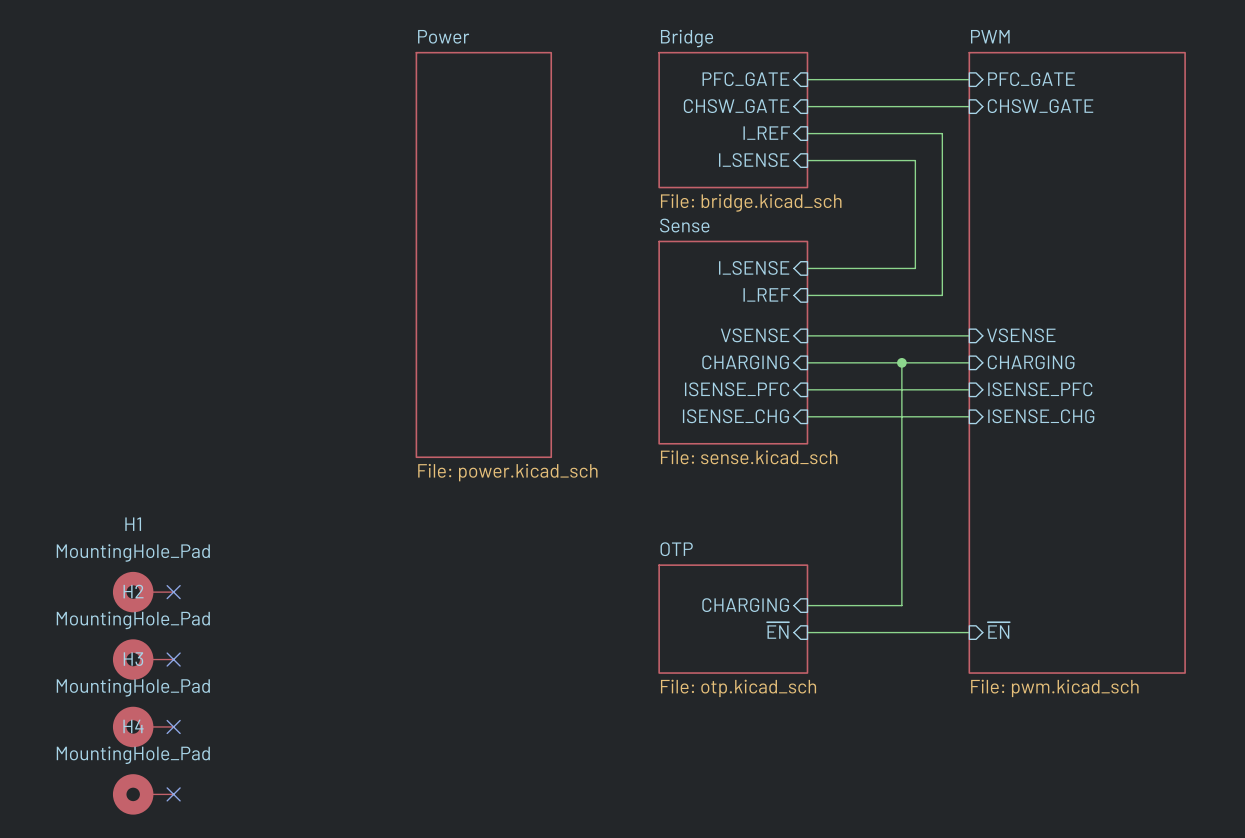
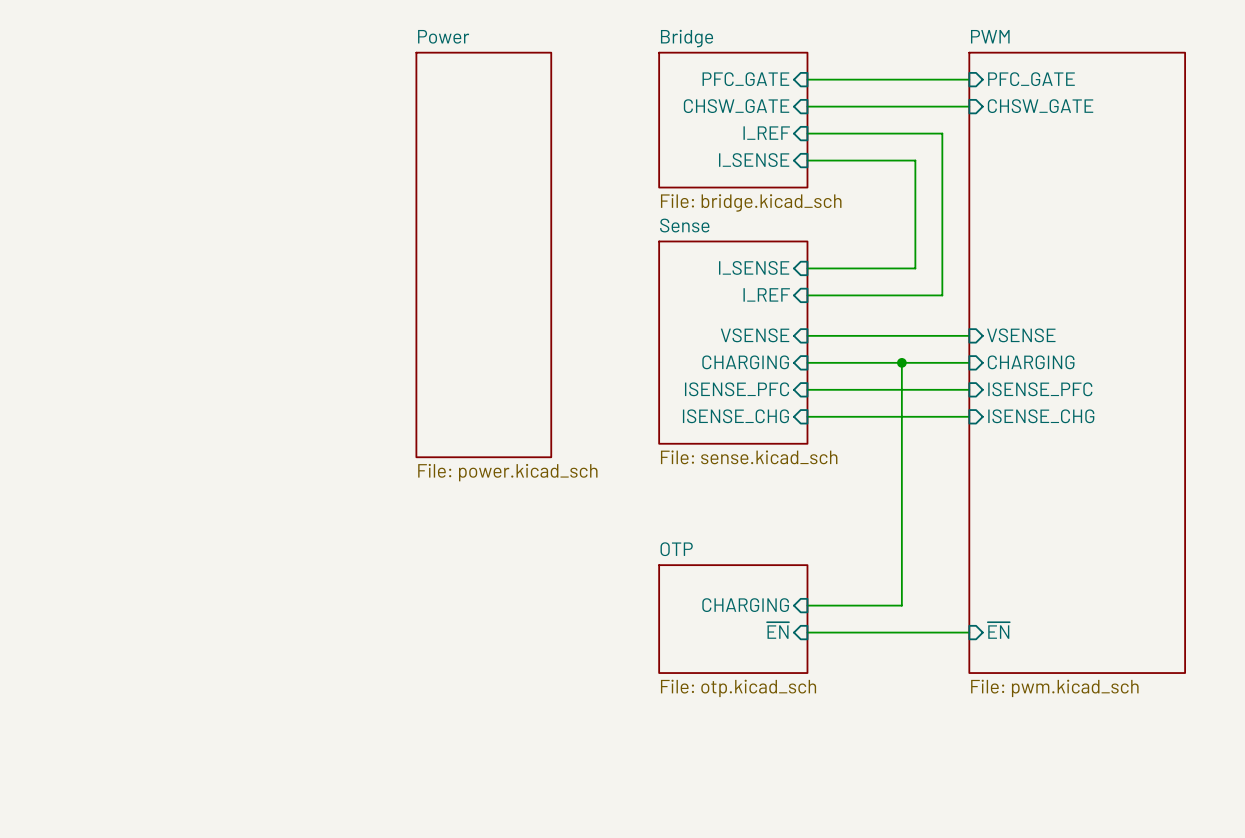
H1: MountingHole_Pad (143, 592) -> none
no-connect mark: (173, 592) -> none
H2: MountingHole_Pad (143, 659) -> none
no-connect mark: (173, 659) -> none
H3: MountingHole_Pad (143, 726) -> none
no-connect mark: (173, 726) -> none
H4: MountingHole_Pad (143, 794) -> none
no-connect mark: (173, 794) -> none

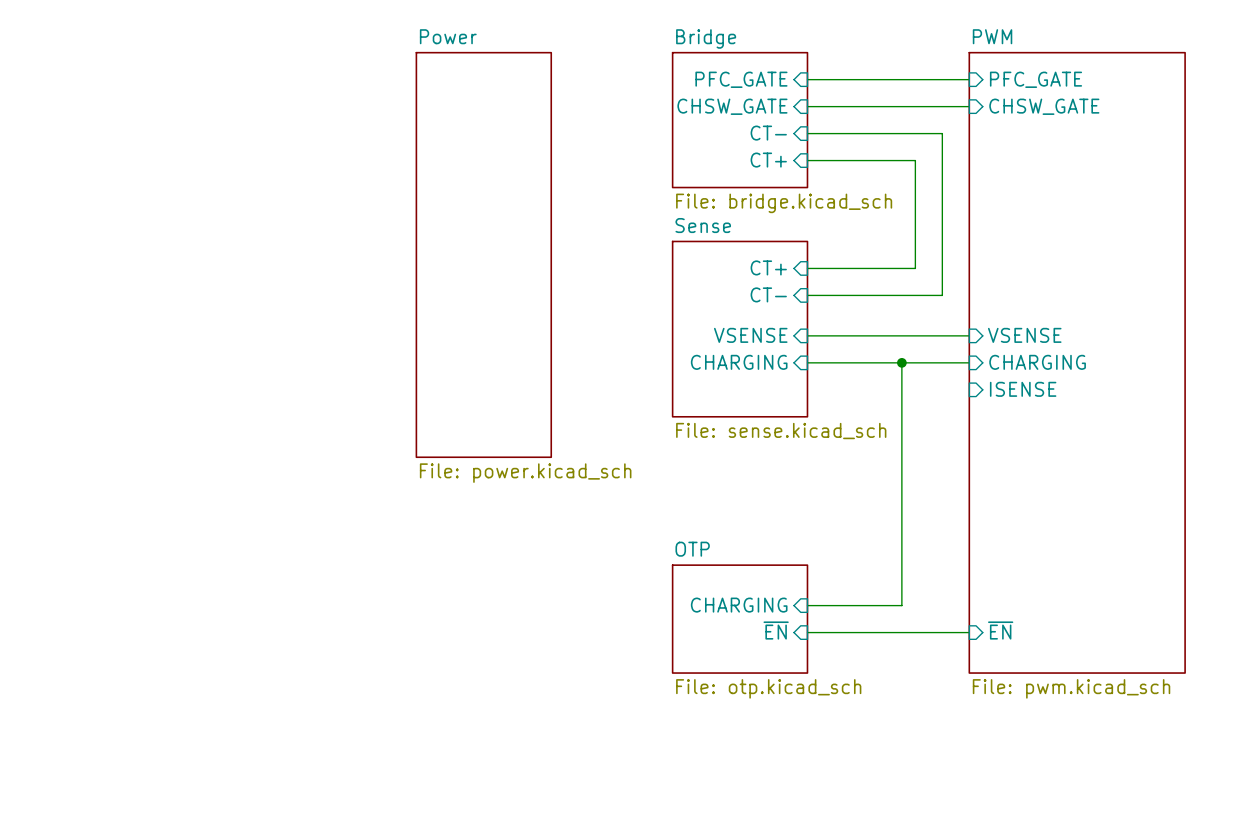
sheet Bridge shape: [658, 51, 809, 189] -> [671, 51, 809, 189]
sheet pin: I_REF (766, 133) -> CT- (768, 133)
sheet pin: I_SENSE (754, 160) -> CT+ (768, 160)
sheet pin: I_SENSE (754, 267) -> CT+ (768, 267)
sheet pin: I_REF (766, 294) -> CT- (768, 294)
sheet Sense: none -> File: sense.kicad_sch (740, 329)
sheet Sense: File: sense.kicad_sch (733, 342) -> none
sheet pin: ISENSE_PFC (737, 389) -> none
wire: (807, 389) (969, 389) -> none
sheet pin: ISENSE_PFC (1040, 389) -> ISENSE (1023, 389)
sheet pin: ISENSE_CHG (735, 416) -> none
wire: (807, 416) (969, 416) -> none
sheet pin: ISENSE_CHG (1041, 416) -> none
sheet OTP shape: [658, 564, 809, 674] -> [671, 564, 809, 674]

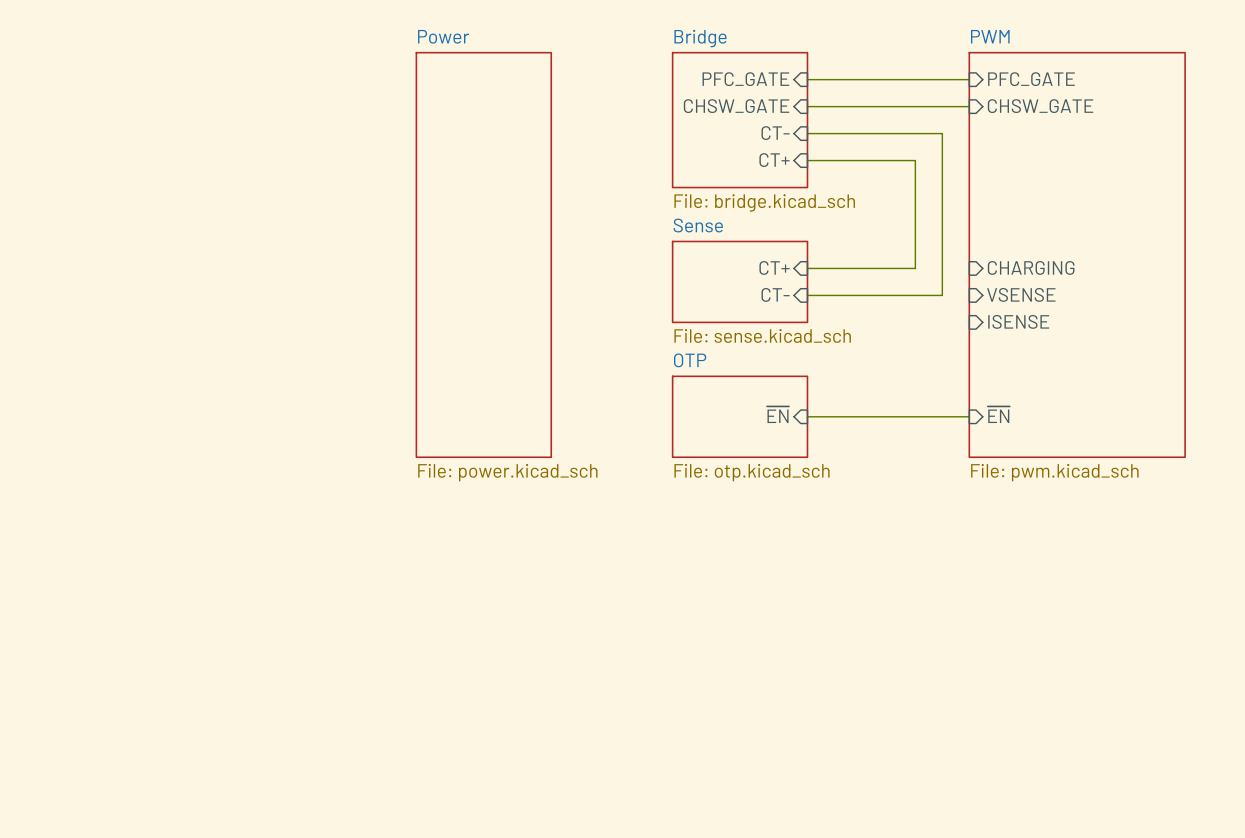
sheet PWM: none -> File: pwm.kicad_sch (1077, 254)
sheet Sense: none -> File: sense.kicad_sch (740, 281)
sheet Sense: File: sense.kicad_sch (740, 329) -> none
sheet pin: VSENSE (750, 335) -> none
wire: (807, 335) (969, 335) -> none
sheet pin position: VSENSE (1024, 335) -> VSENSE (1021, 294)
sheet pin: CHARGING (739, 362) -> none
wire: (807, 362) (969, 362) -> (807, 416) (969, 416)
wire: (901, 362) (901, 605) (807, 605) -> none
junction: (901, 362) -> none
sheet pin position: CHARGING (1037, 362) -> CHARGING (1031, 267)
sheet PWM: File: pwm.kicad_sch (1077, 362) -> none
sheet pin position: ISENSE (1023, 389) -> ISENSE (1018, 321)
sheet pin: none -> ~{EN} (778, 414)
sheet pin: none -> ~{EN} (998, 414)
sheet OTP: none -> File: otp.kicad_sch (740, 416)
sheet pin: CHARGING (739, 605) -> none
sheet OTP: File: otp.kicad_sch (740, 619) -> none
sheet pin: ~{EN} (776, 630) -> none
sheet pin: ~{EN} (1000, 630) -> none
wire: (807, 632) (969, 632) -> none

